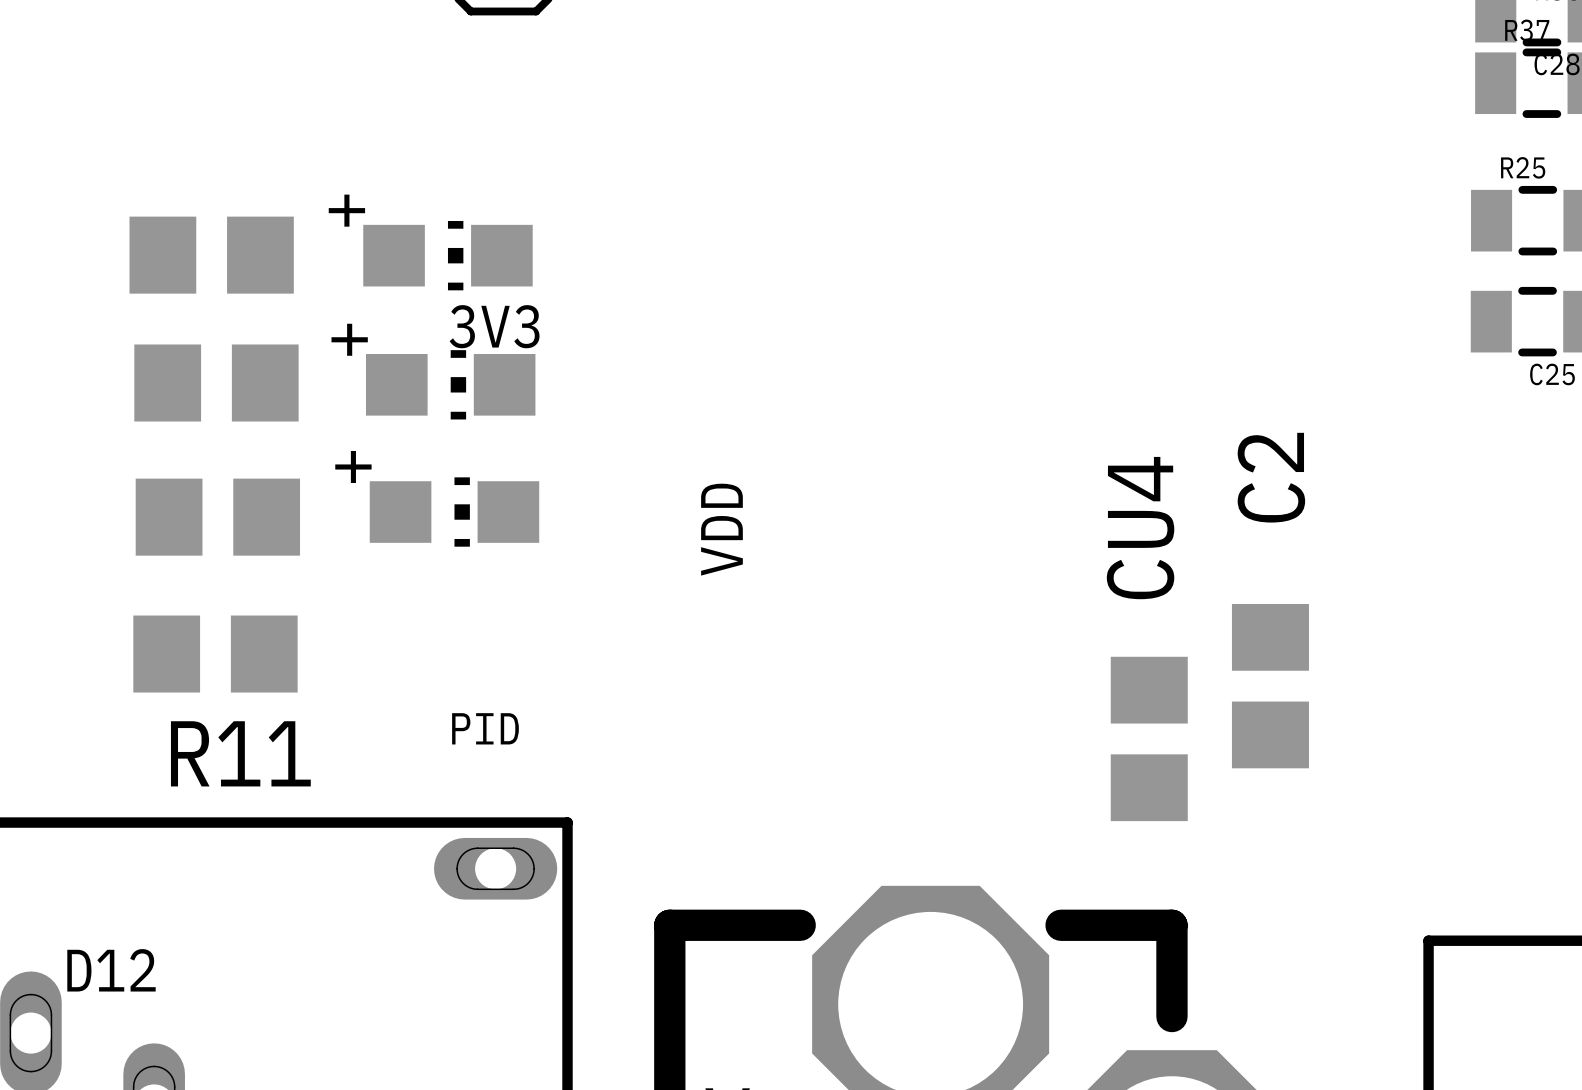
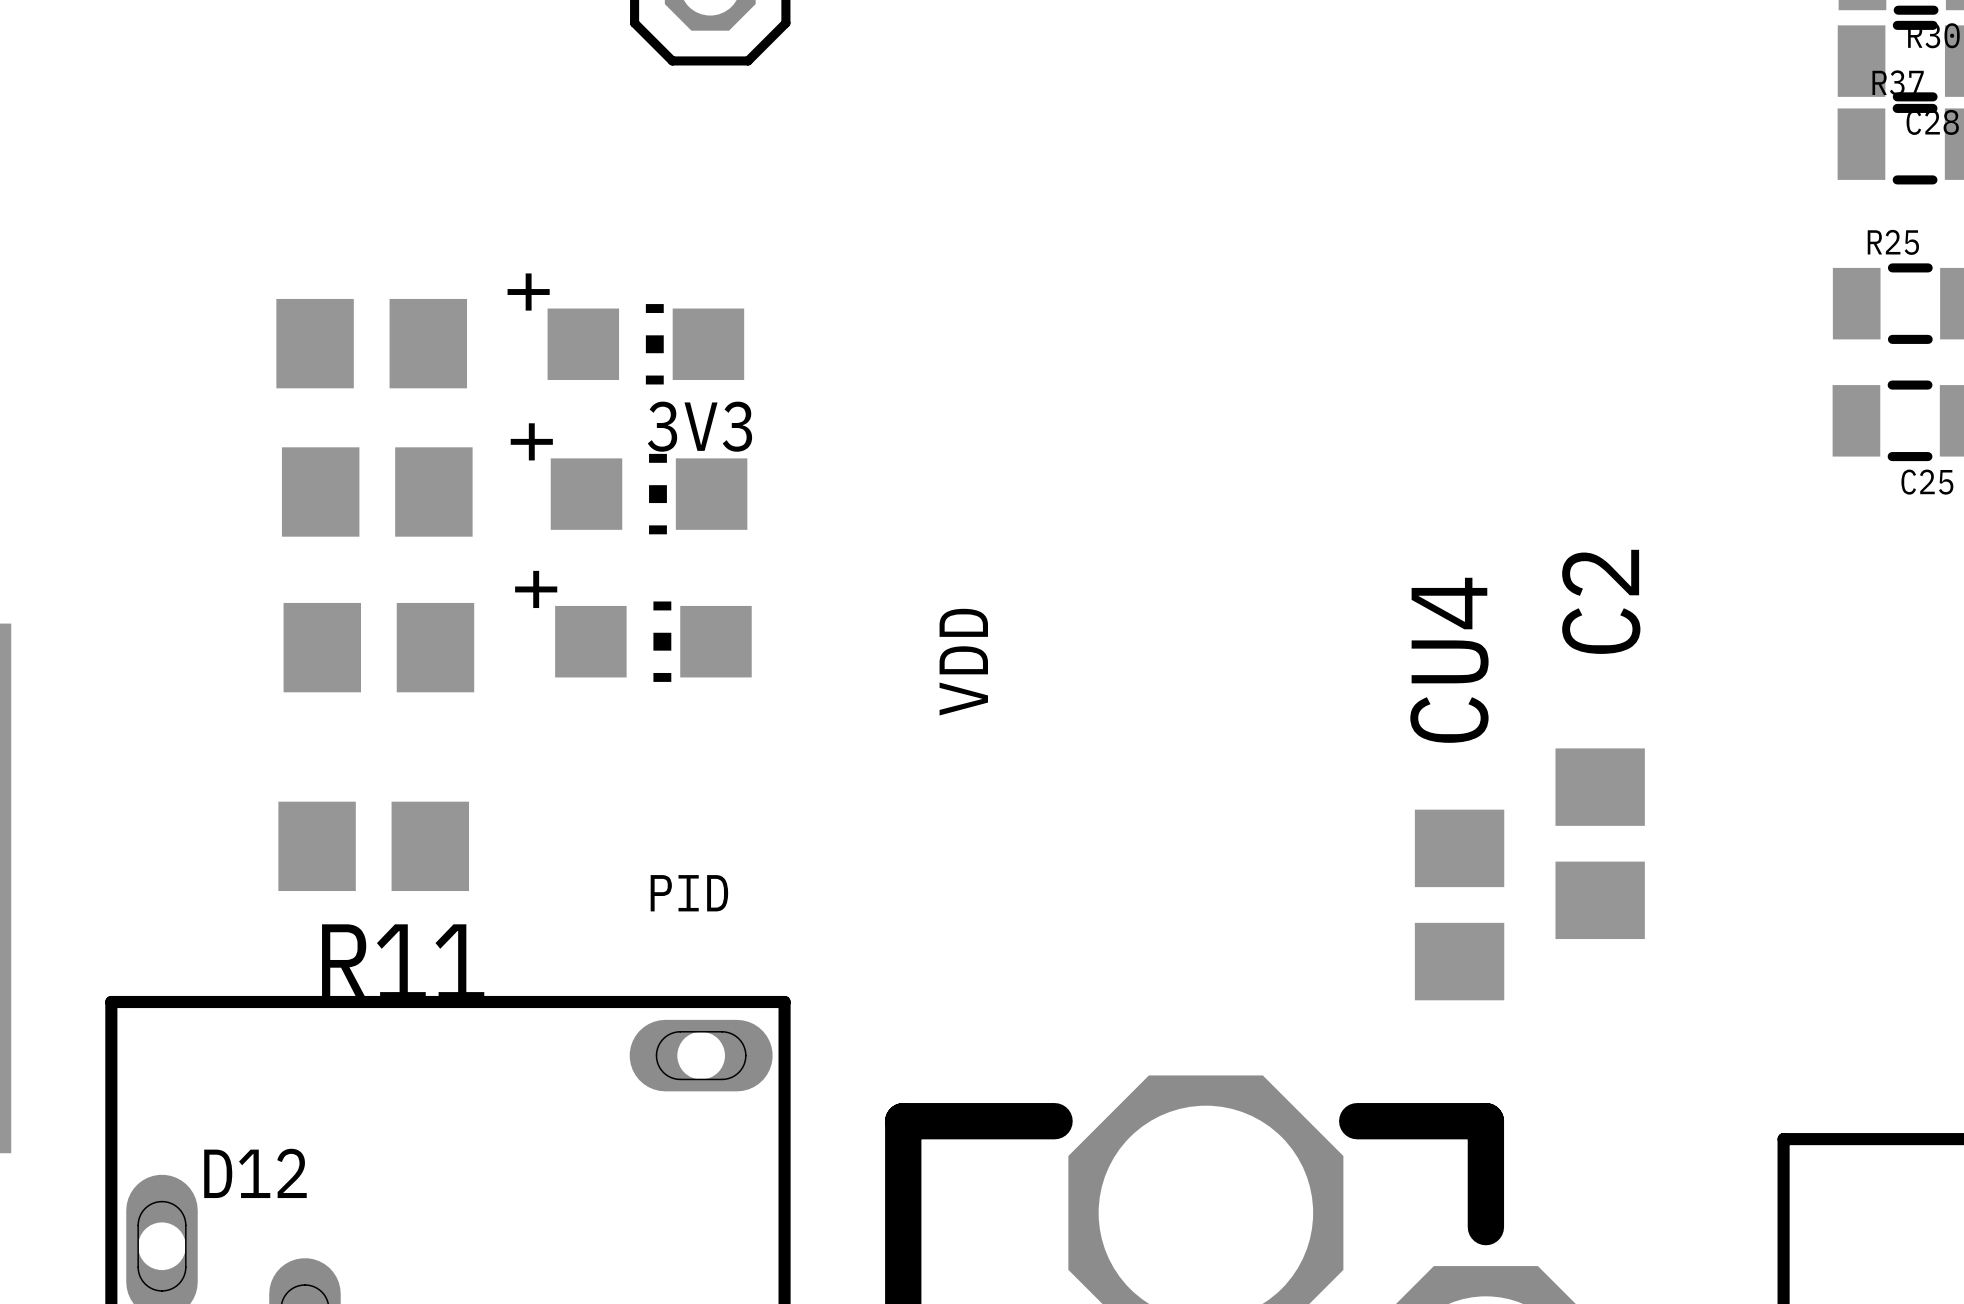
R11 position: (215, 654) -> (373, 846)

